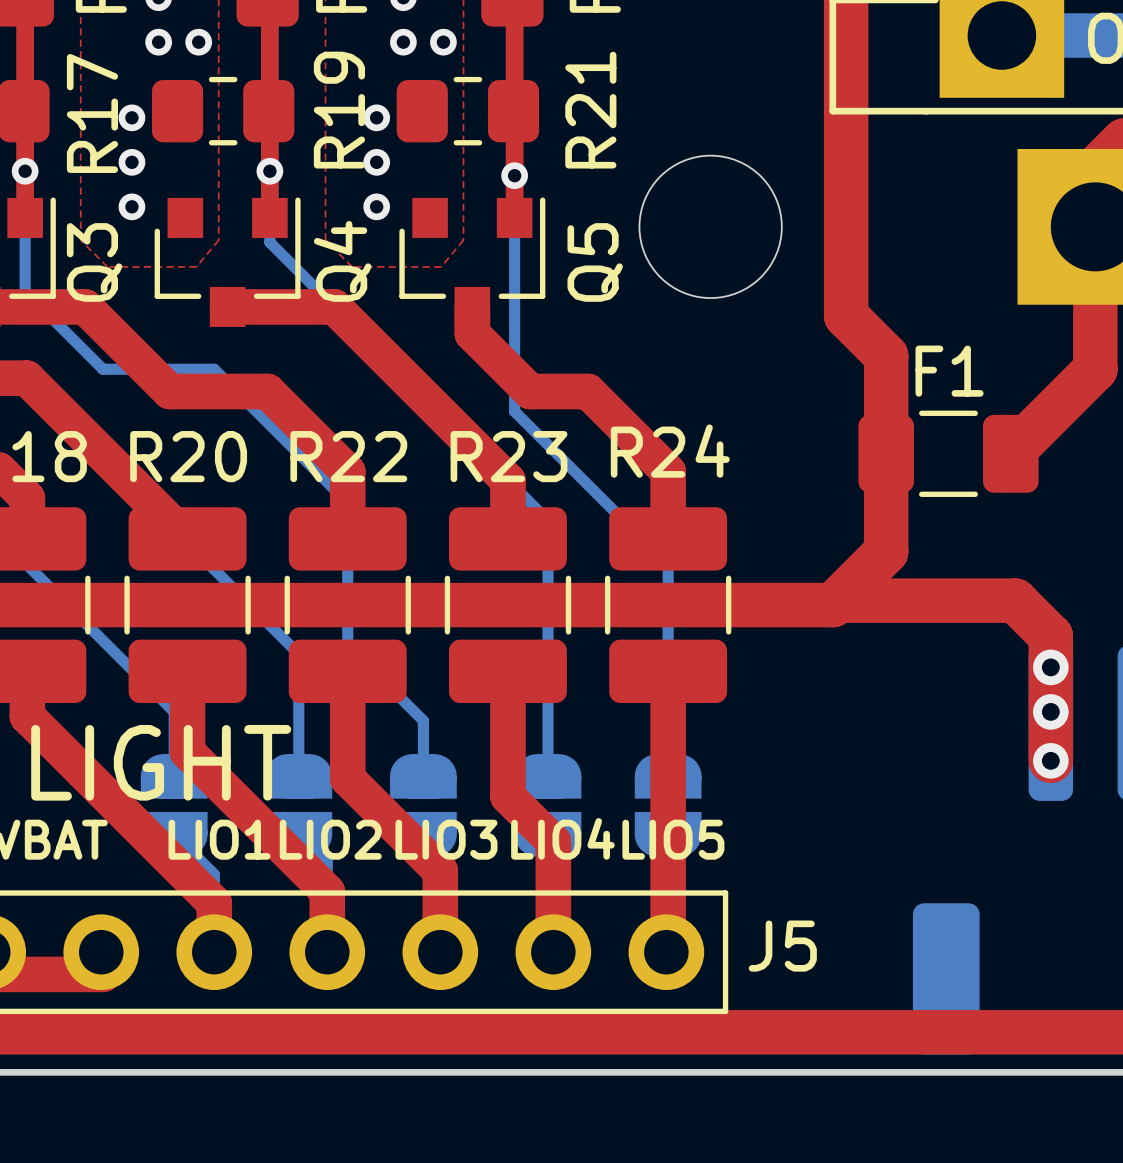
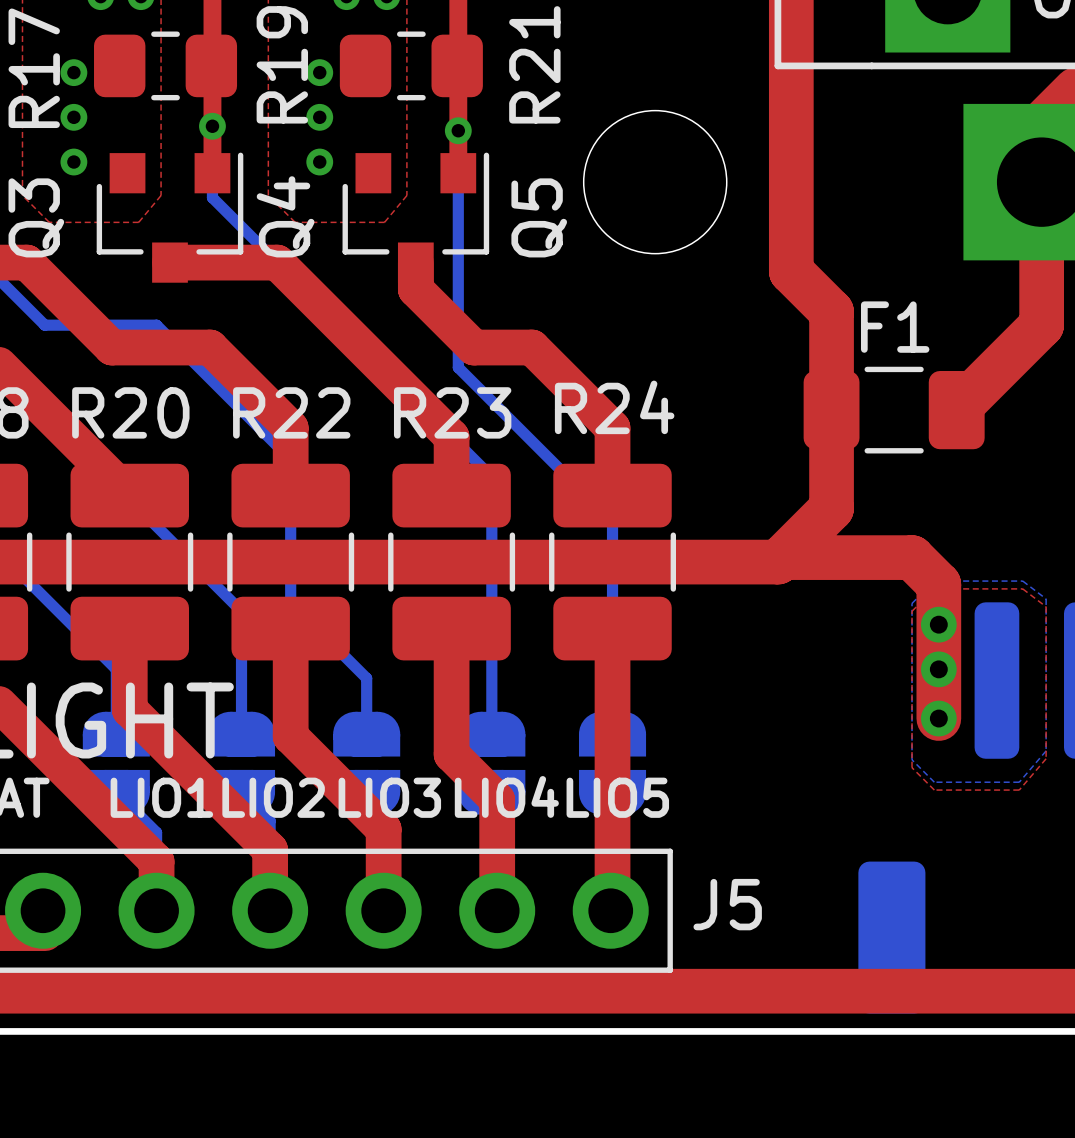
top track: (966, 600) (1015, 600) (1050, 636) (1050, 760) -> (912, 557) (938, 584) (938, 718)
bottom zone outline: none -> (934, 581) (1022, 581) (1046, 598) (1046, 750) (1019, 782) (934, 782) (912, 759) (912, 603) (934, 581)
top zone outline: none -> (934, 588) (1022, 588) (1046, 606) (1046, 758) (1019, 790) (934, 790) (912, 767) (912, 611) (934, 588)
via: none -> (938, 624)
via: (1050, 667) -> none
via: none -> (938, 669)
via: (1050, 711) -> none
via: none -> (938, 718)
via: (1050, 760) -> none

